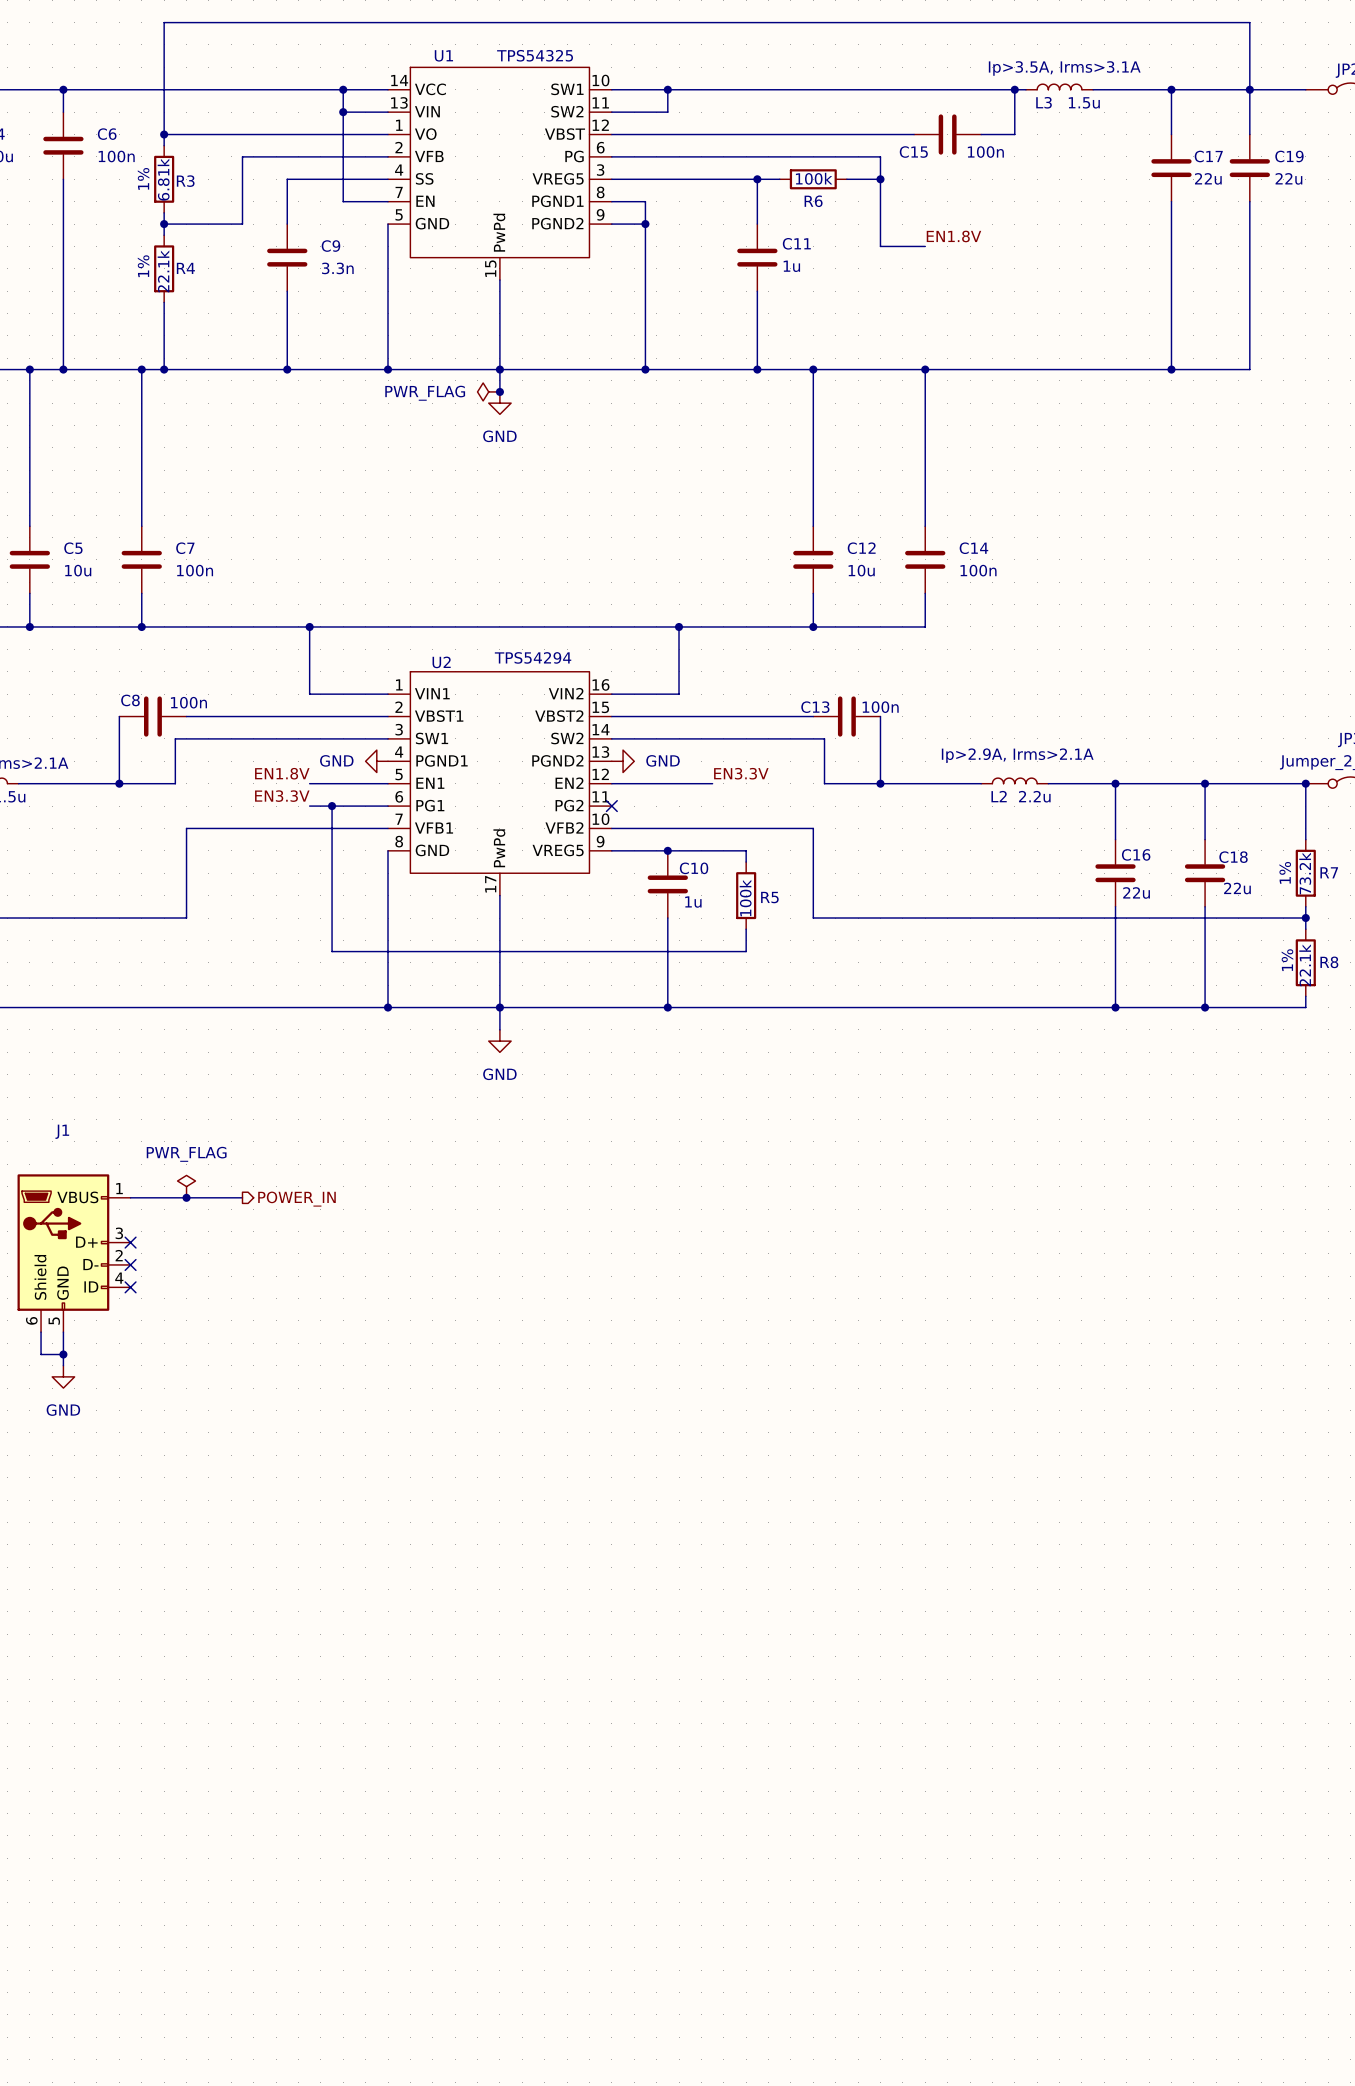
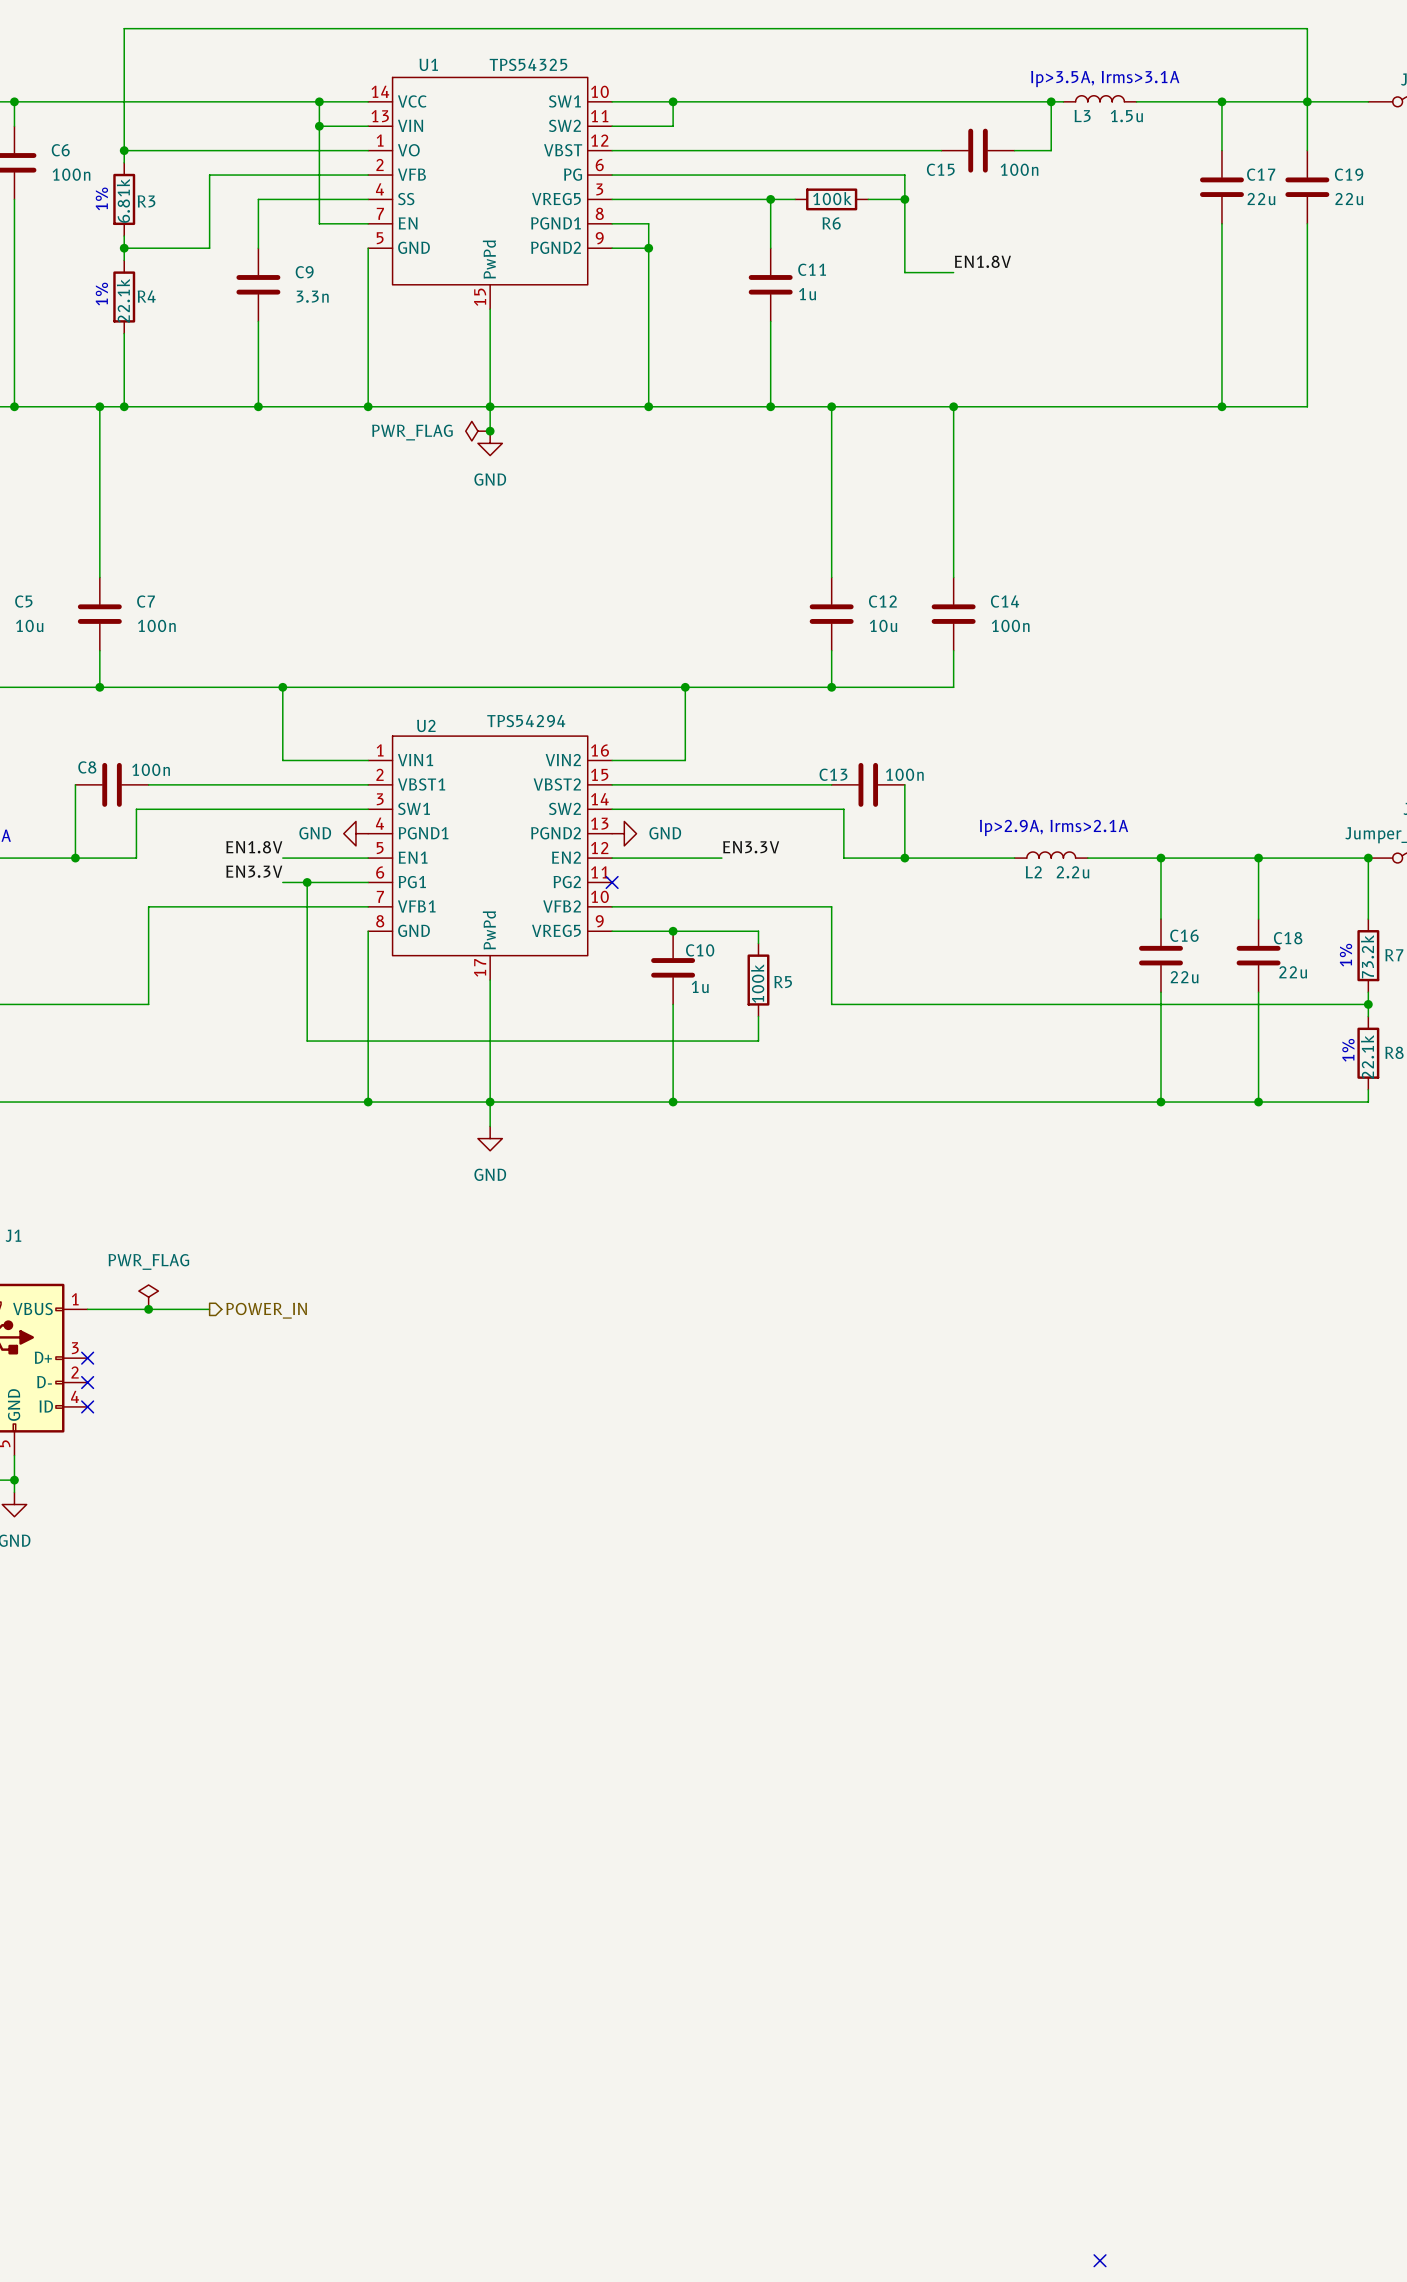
no-connect mark: none -> (1100, 2260)

